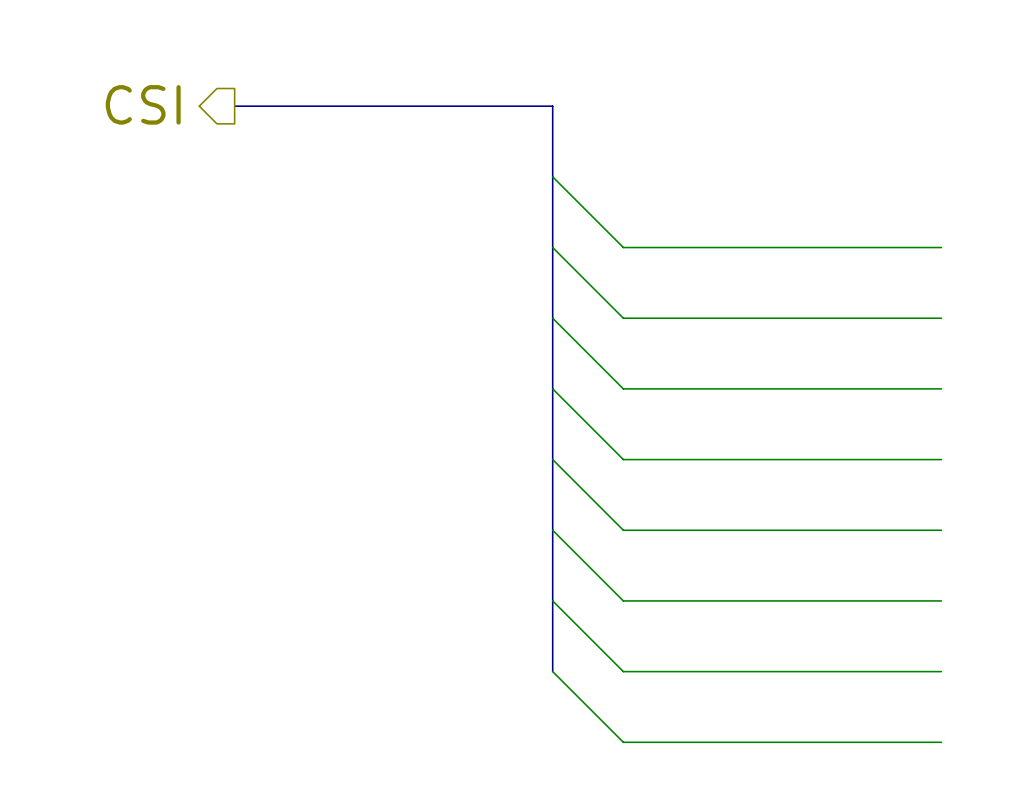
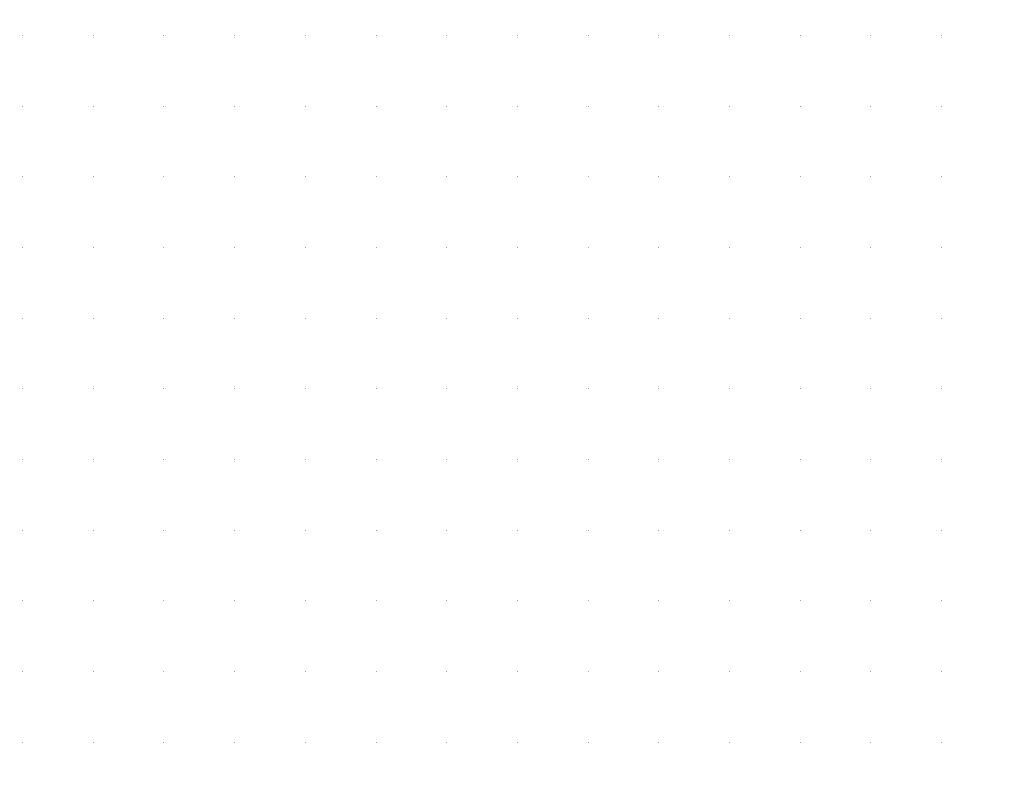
hierarchical label: CSI (143, 104) -> none
bus: (234, 106) (552, 106) (552, 671) -> none
wire: (552, 176) (623, 247) (941, 247) -> none
wire: (552, 247) (623, 318) (941, 318) -> none
wire: (552, 318) (623, 388) (941, 388) -> none
wire: (552, 388) (623, 459) (941, 459) -> none
wire: (552, 459) (623, 530) (941, 530) -> none
wire: (552, 530) (623, 600) (941, 600) -> none
wire: (552, 600) (623, 671) (941, 671) -> none
wire: (552, 671) (623, 742) (941, 742) -> none

